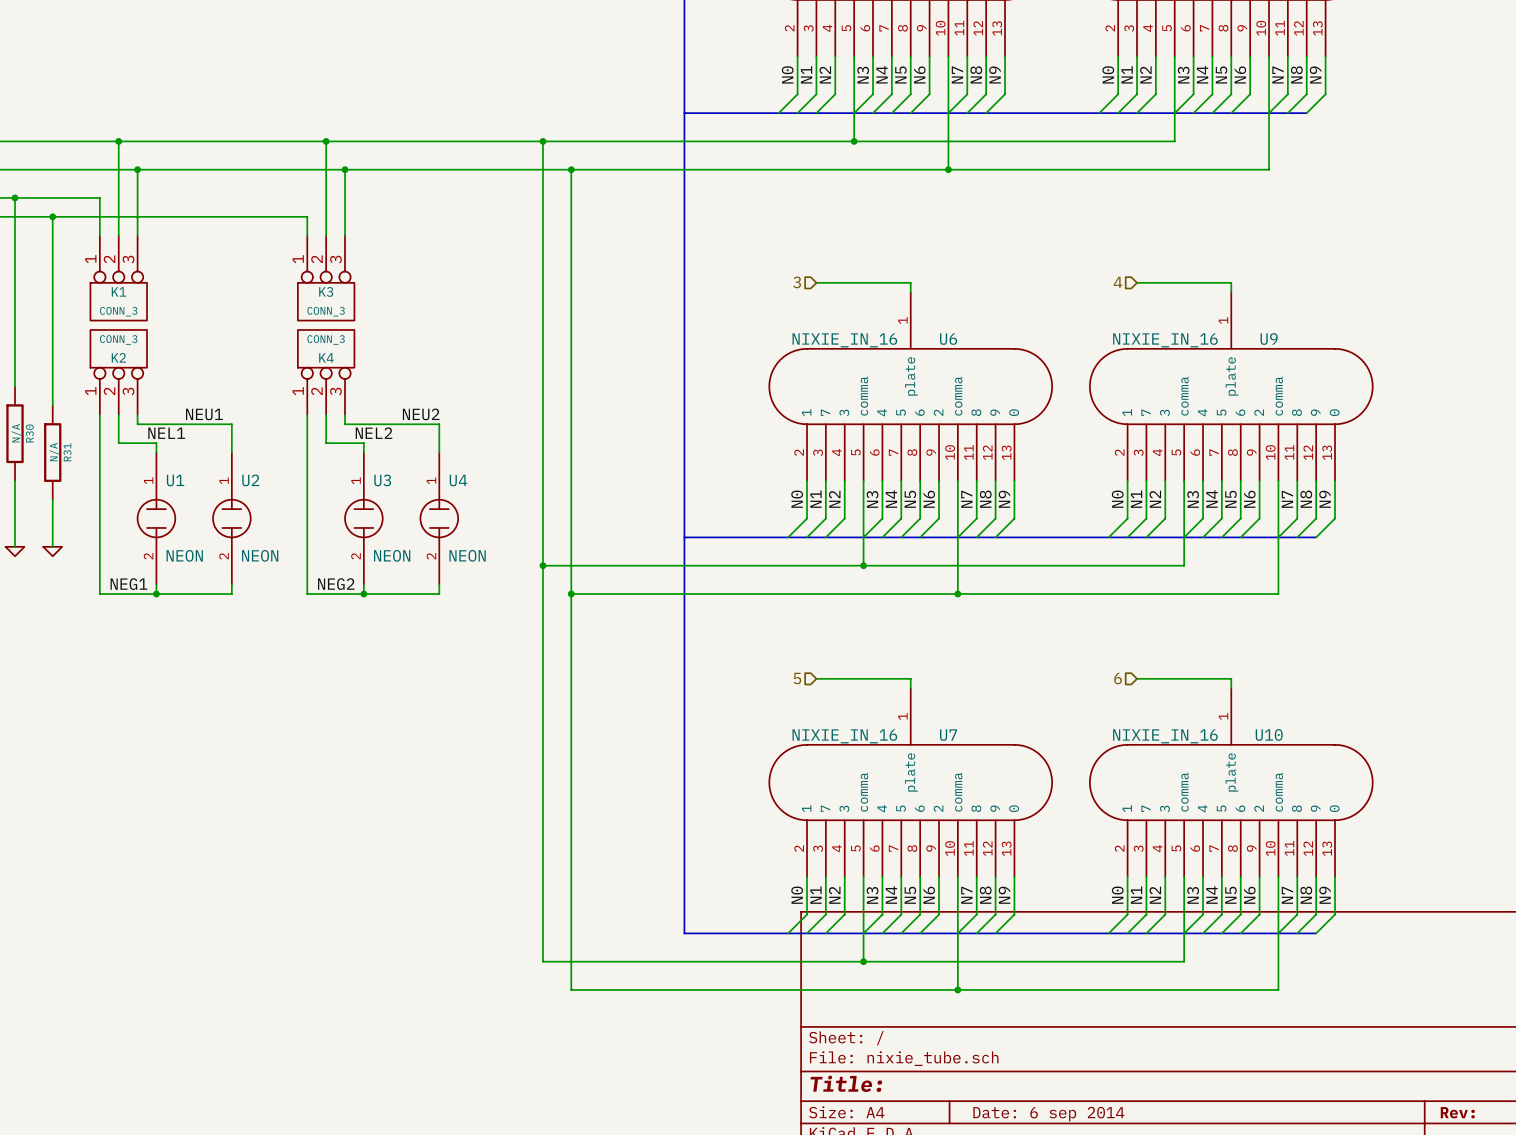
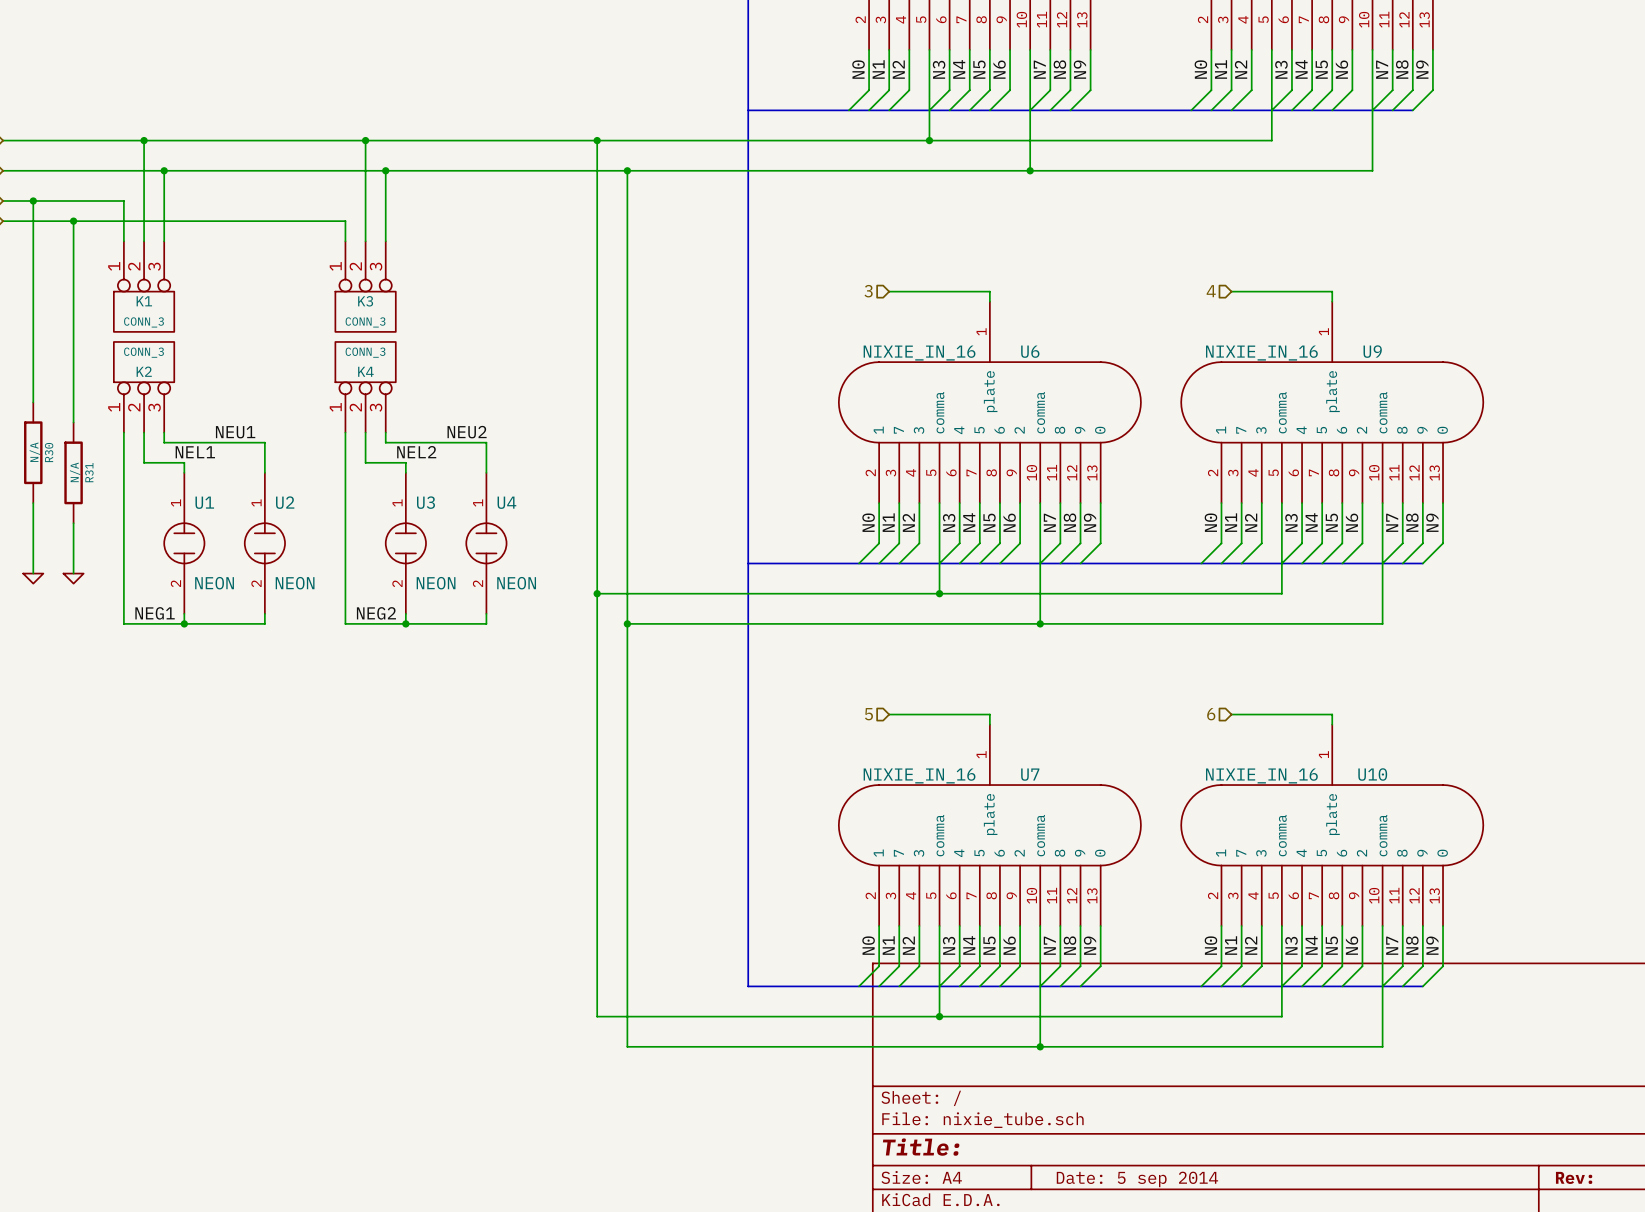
title block: Date: 6 sep 2014 (1048, 1114) -> Date: 5 sep 2014 (1137, 1179)

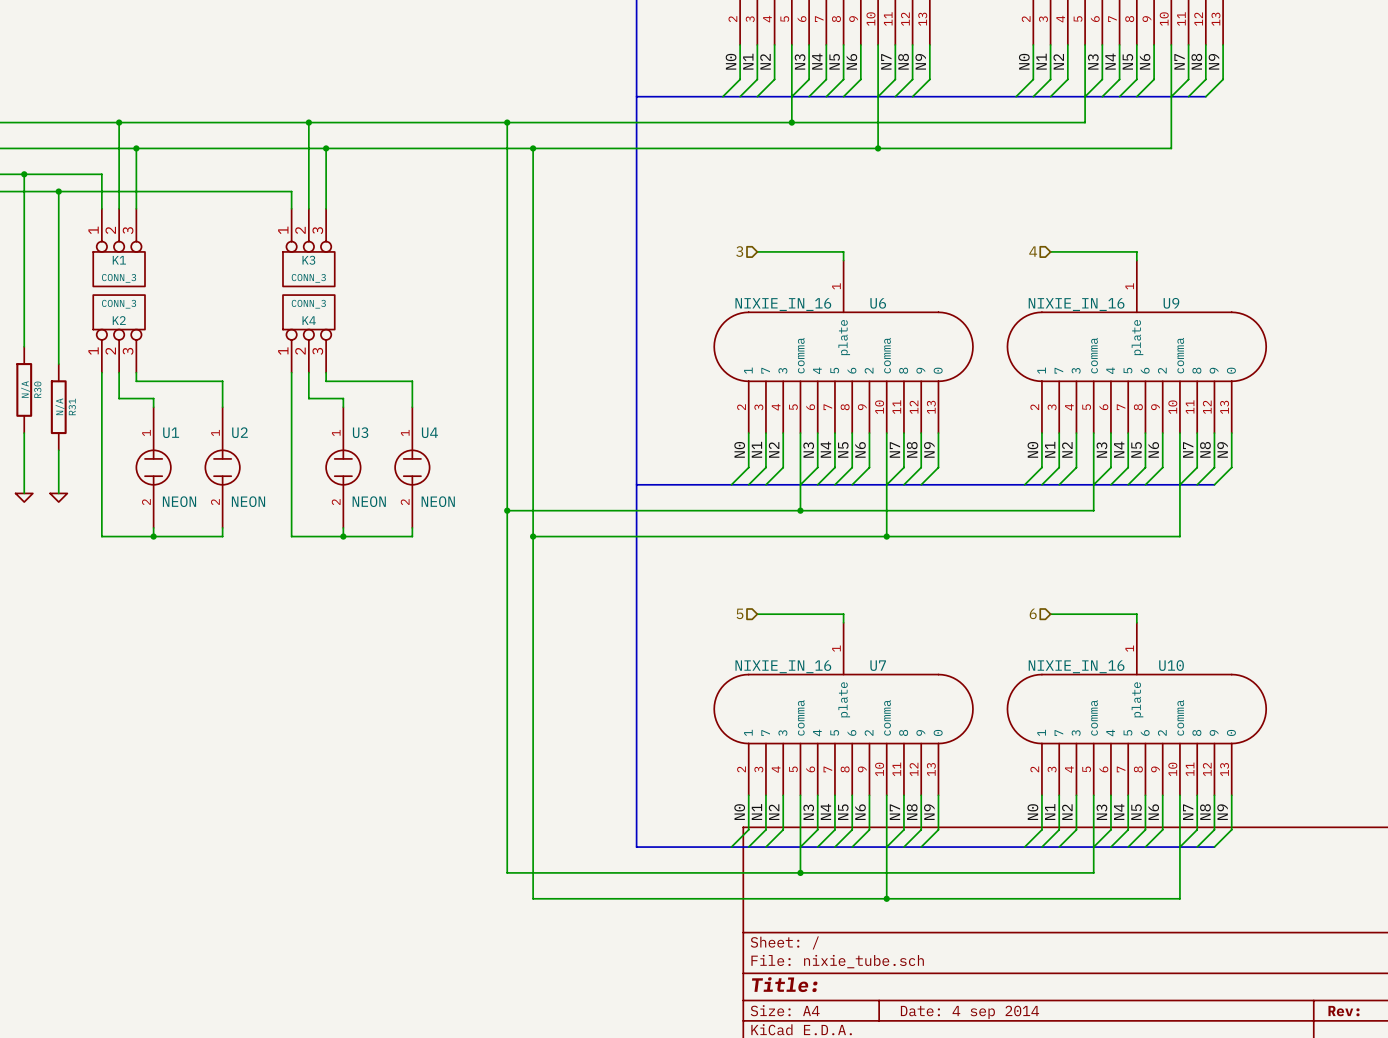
label: NEU1 (235, 432) -> none
label: NEU2 (467, 432) -> none
label: NEL1 (195, 452) -> none
label: NEL2 (416, 452) -> none
label: NEG1 (155, 613) -> none
label: NEG2 (376, 613) -> none
title block: Date: 5 sep 2014 (1137, 1179) -> Date: 4 sep 2014 (969, 1012)

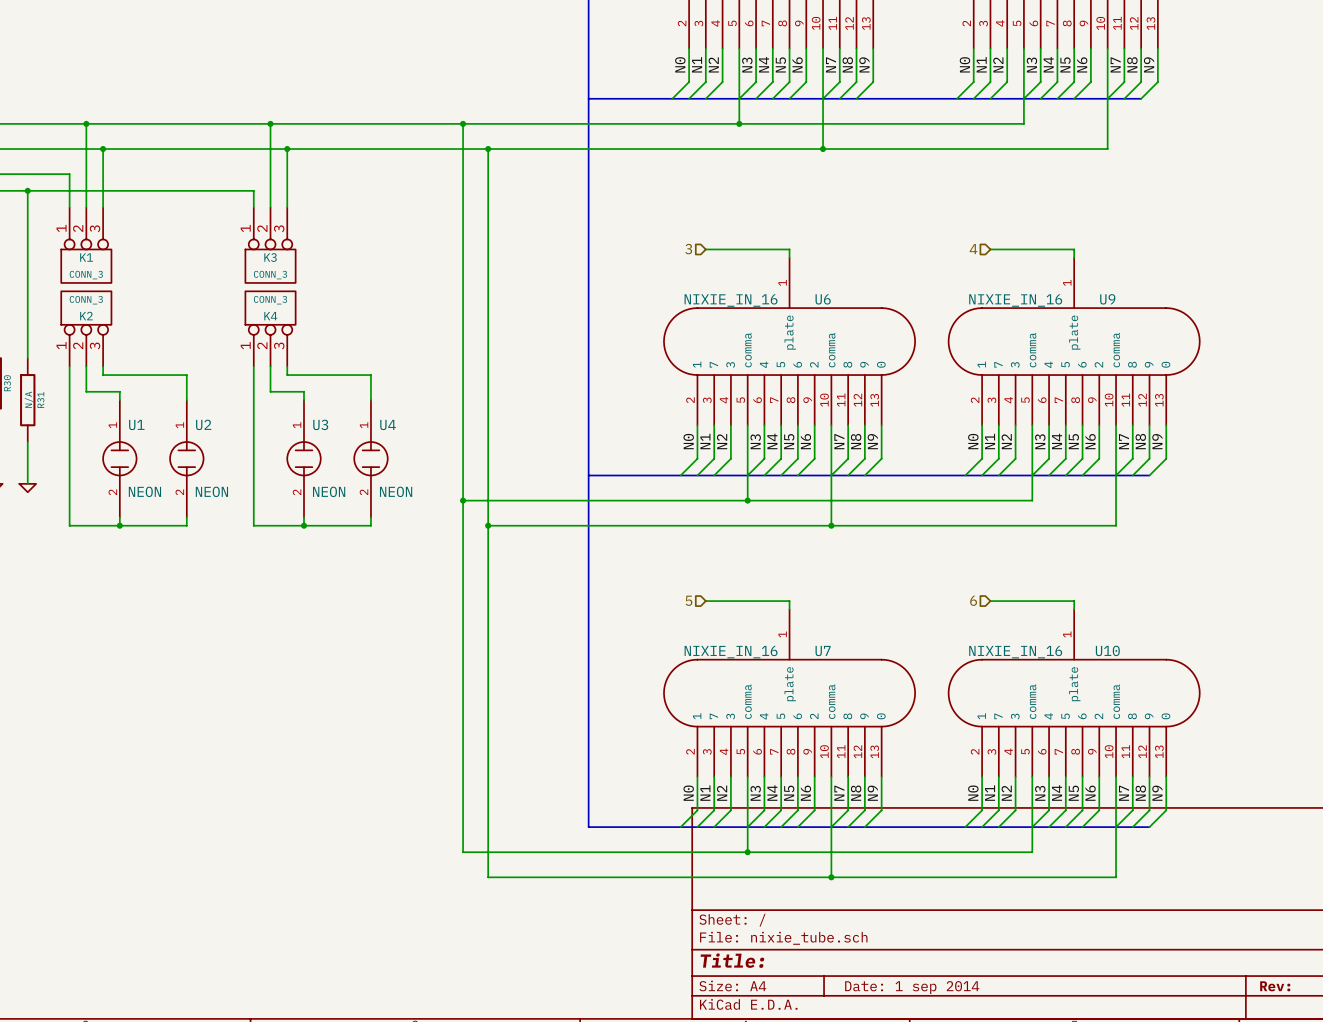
title block: Date: 4 sep 2014 (969, 1012) -> Date: 1 sep 2014 (912, 987)

